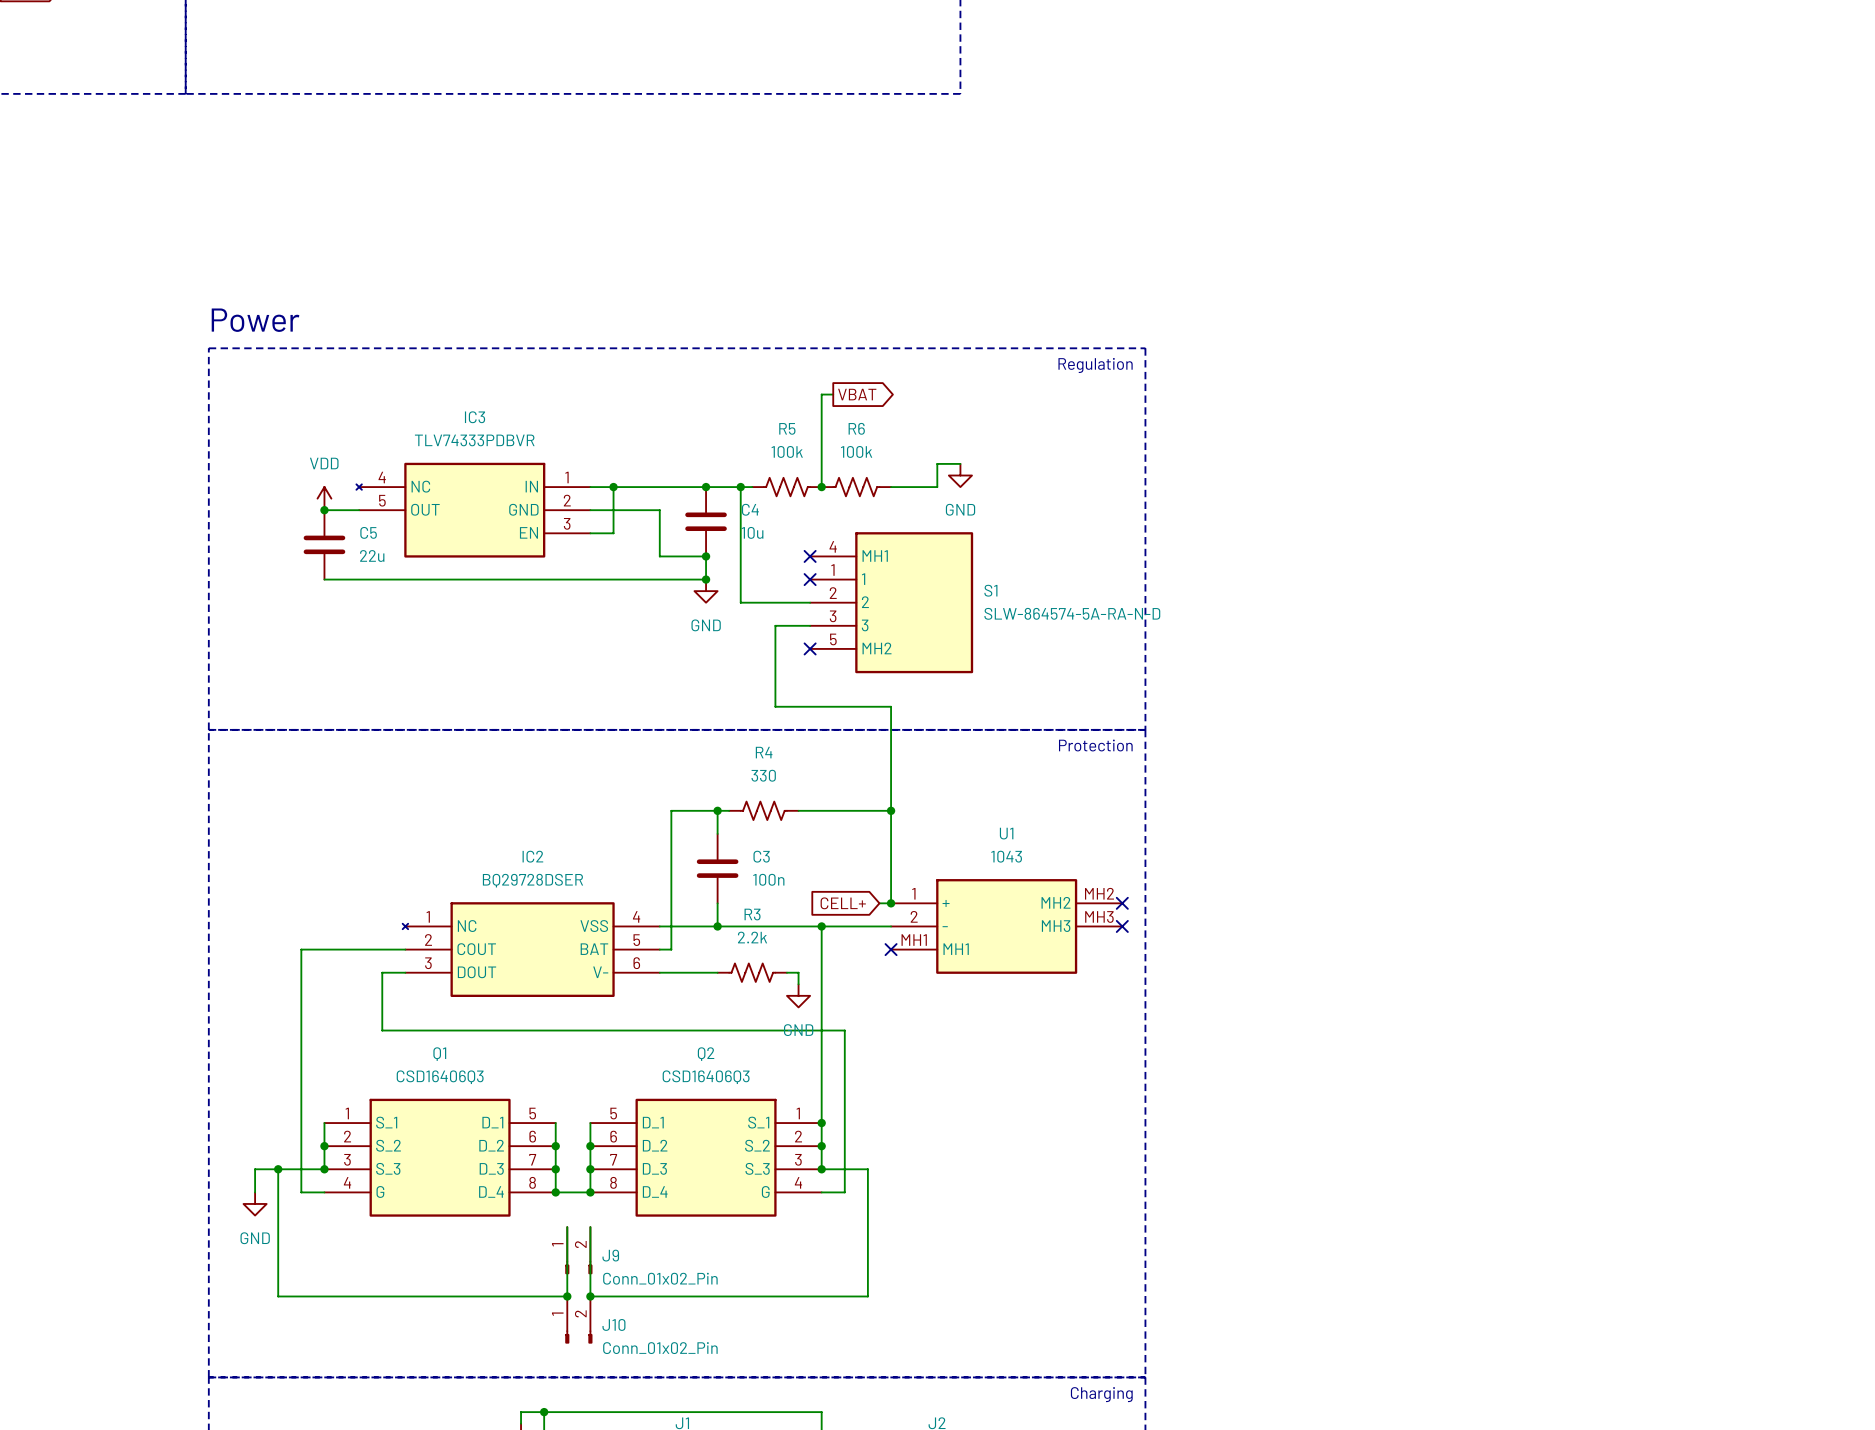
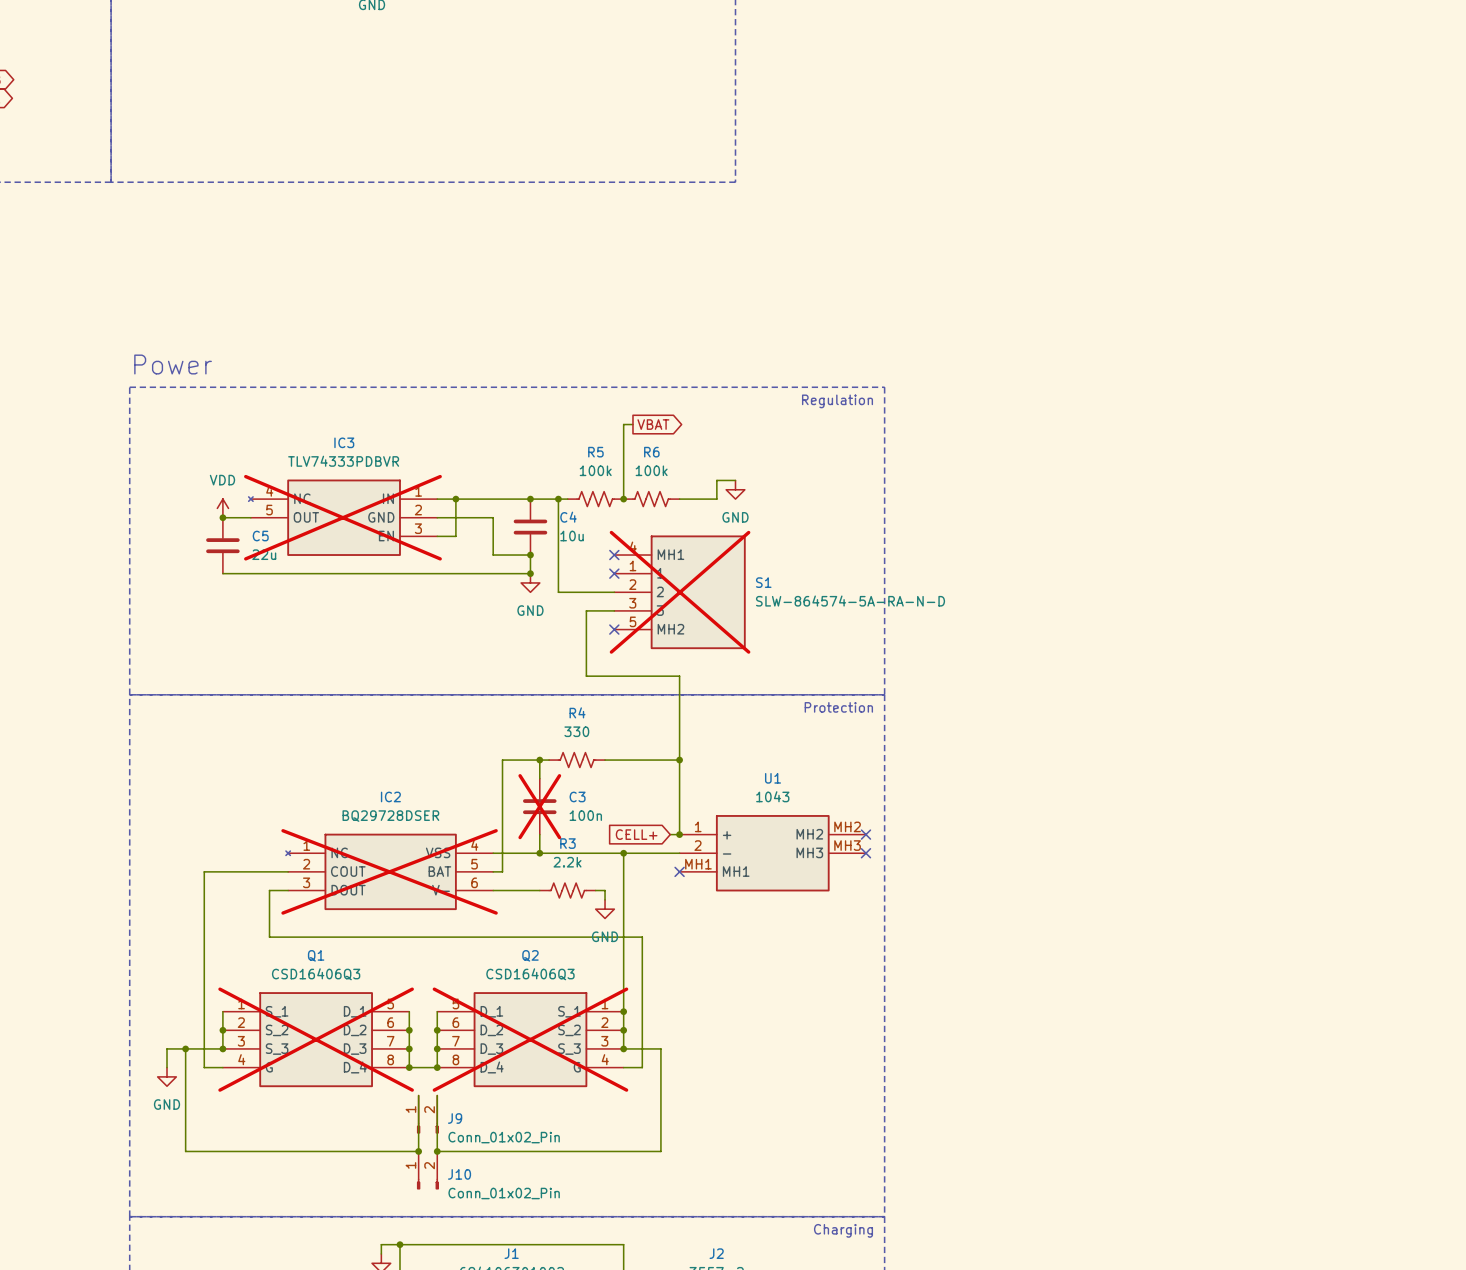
IC3 do-not-place cross: none -> (342, 517)
S1 do-not-place cross: none -> (680, 592)
C3 do-not-place cross: none -> (539, 806)
IC2 do-not-place cross: none -> (389, 871)
Q1 do-not-place cross: none -> (316, 1039)
Q2 do-not-place cross: none -> (530, 1039)

